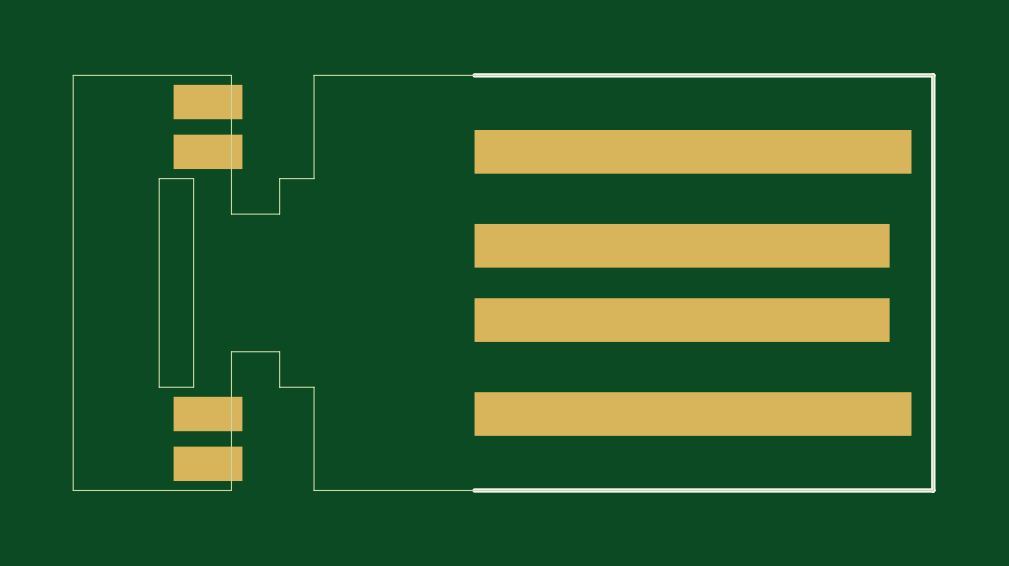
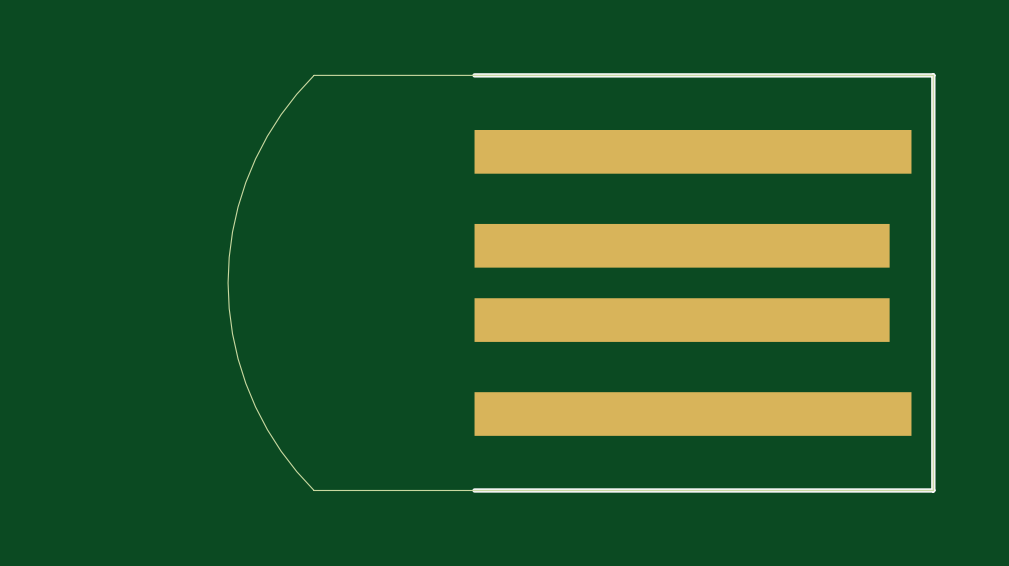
board edge: (314, 75) (314, 178) (279, 178) (279, 214) (231, 214) (231, 75) (73, 75) (73, 490) (231, 490) (231, 351) (279, 351) (279, 387) (314, 387) (314, 490) -> (314, 75) (281, 114) (255, 158) (245, 182) (232, 231) (228, 282) (232, 333) (245, 383) (255, 406) (281, 451) (314, 490)
part: (208, 102) -> none
part: (208, 151) -> none
board edge: (193, 178) (193, 387) (159, 387) (159, 178) (193, 178) -> none
part: (208, 414) -> none
part: (208, 463) -> none

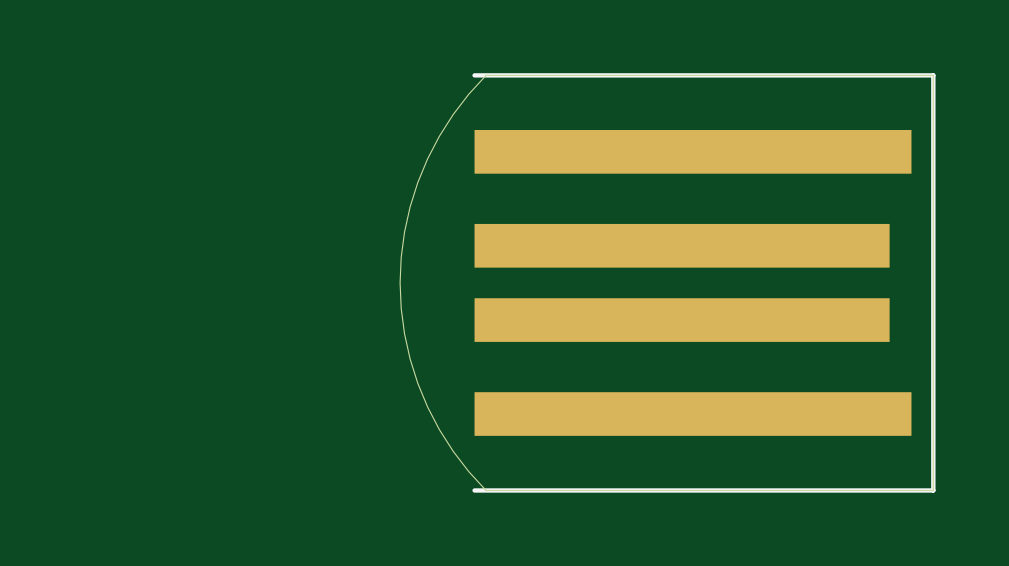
board edge: (486, 75) (314, 75) (281, 114) (255, 158) (245, 182) (232, 231) (228, 282) (232, 333) (245, 383) (255, 406) (281, 451) (314, 490) (486, 490) -> (486, 75) (453, 114) (427, 158) (417, 182) (404, 231) (400, 282) (404, 333) (417, 383) (427, 406) (453, 451) (486, 490)

